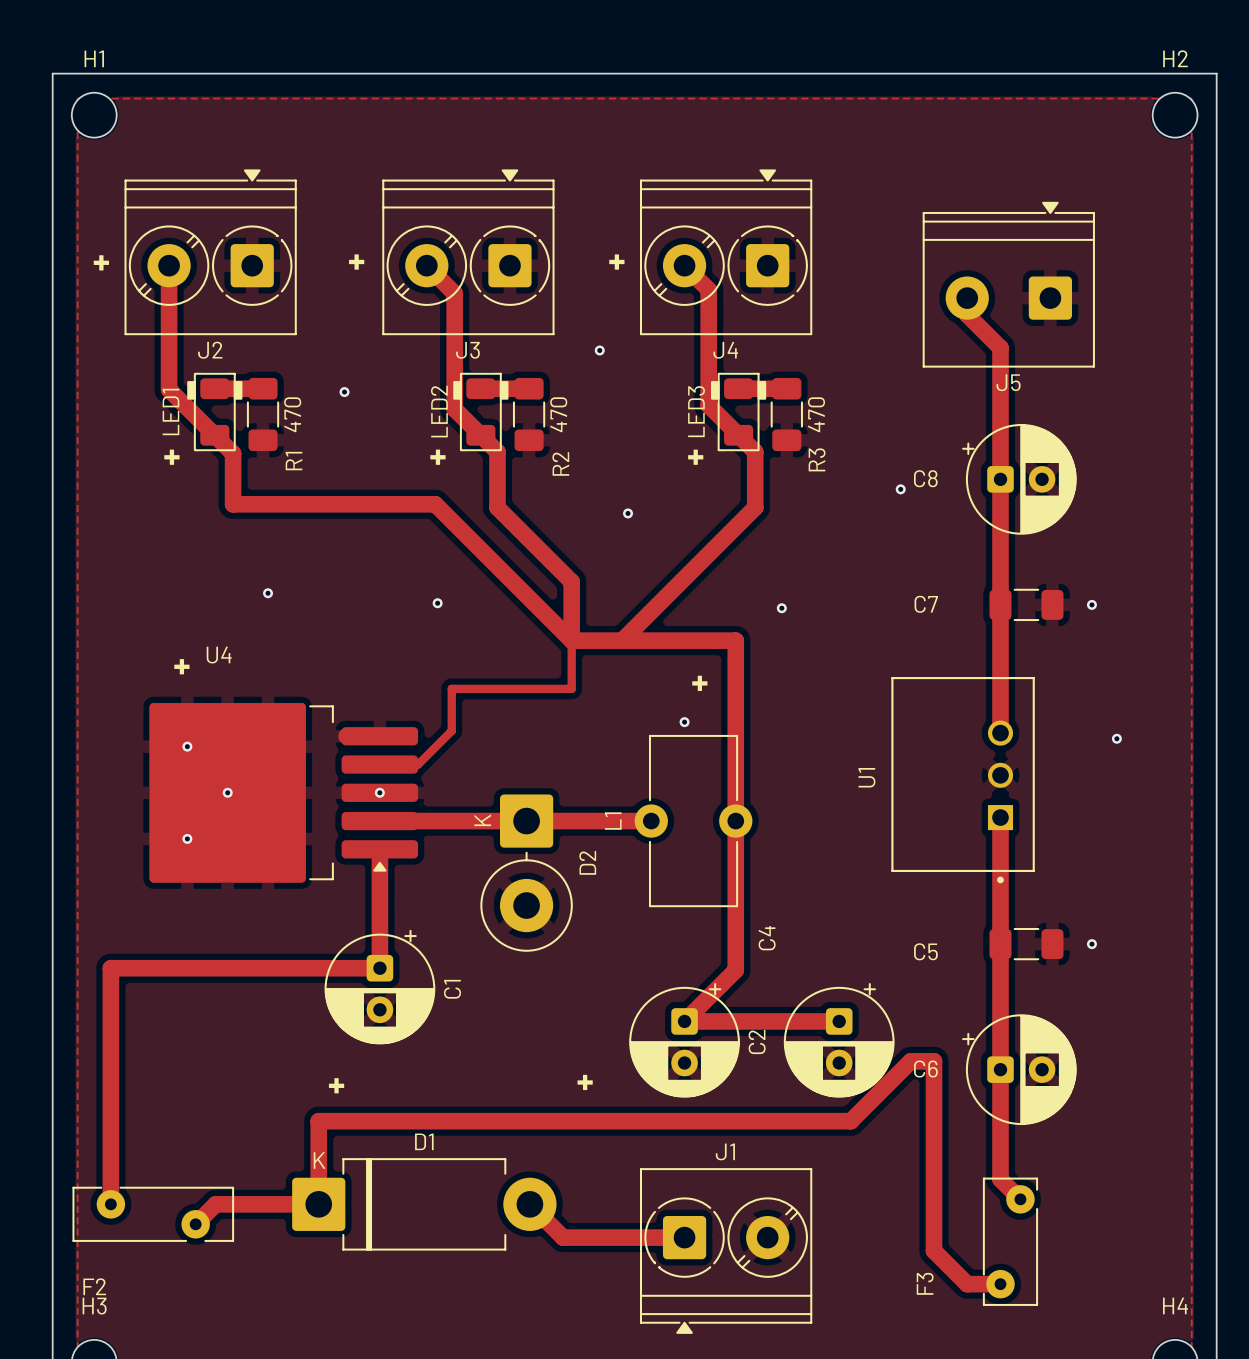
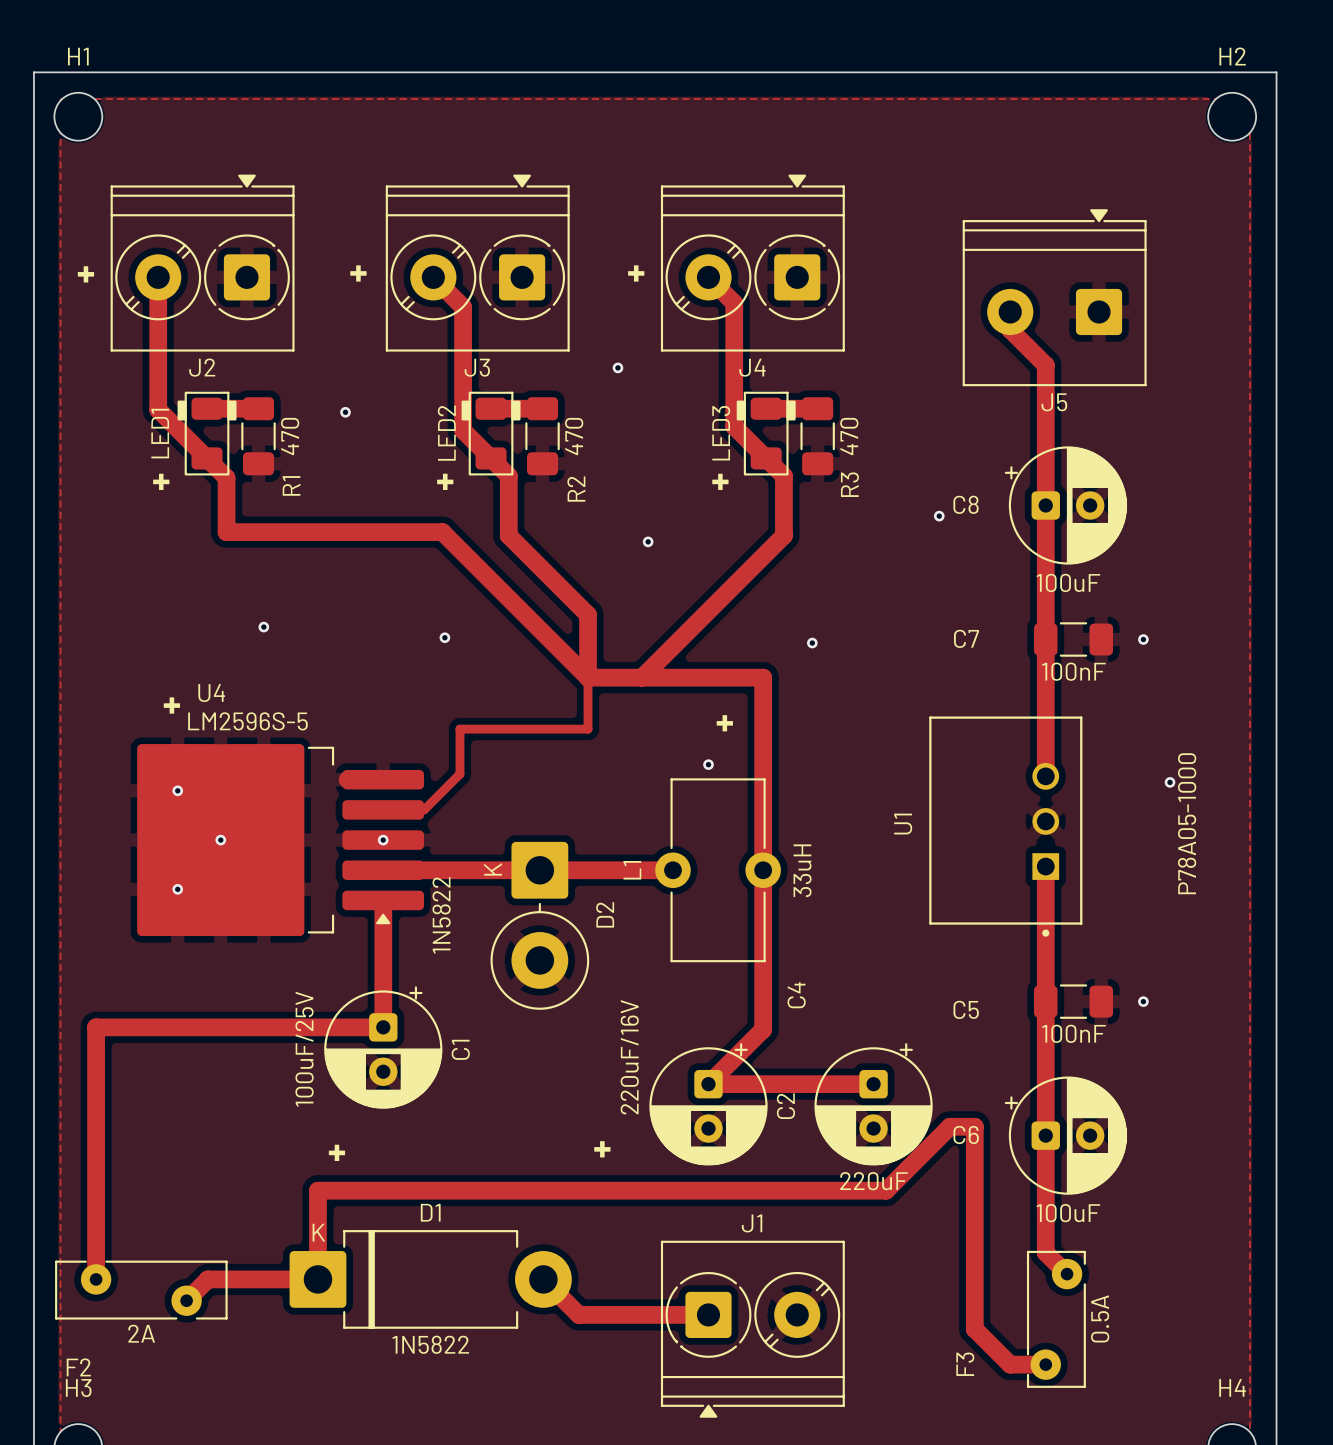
C8 value: none -> 100uF (1068, 582)
C7 value: none -> 100nF (1073, 671)
U4 value: none -> LM2596S-5 (247, 721)
U1 value: none -> P78A05-1000 (1187, 823)
L1 value: none -> 33uH (802, 870)
D2 value: none -> 1N5822 (441, 915)
C5 value: none -> 100nF (1073, 1033)
C1 value: none -> 100uF/25V (304, 1049)
C2 value: none -> 220uF/16V (629, 1057)
C4 value: none -> 220uF (874, 1181)
C6 value: none -> 100uF (1068, 1213)
F3 value: none -> 0.5A (1100, 1318)
F2 value: none -> 2A (141, 1333)
D1 value: none -> 1N5822 (430, 1344)

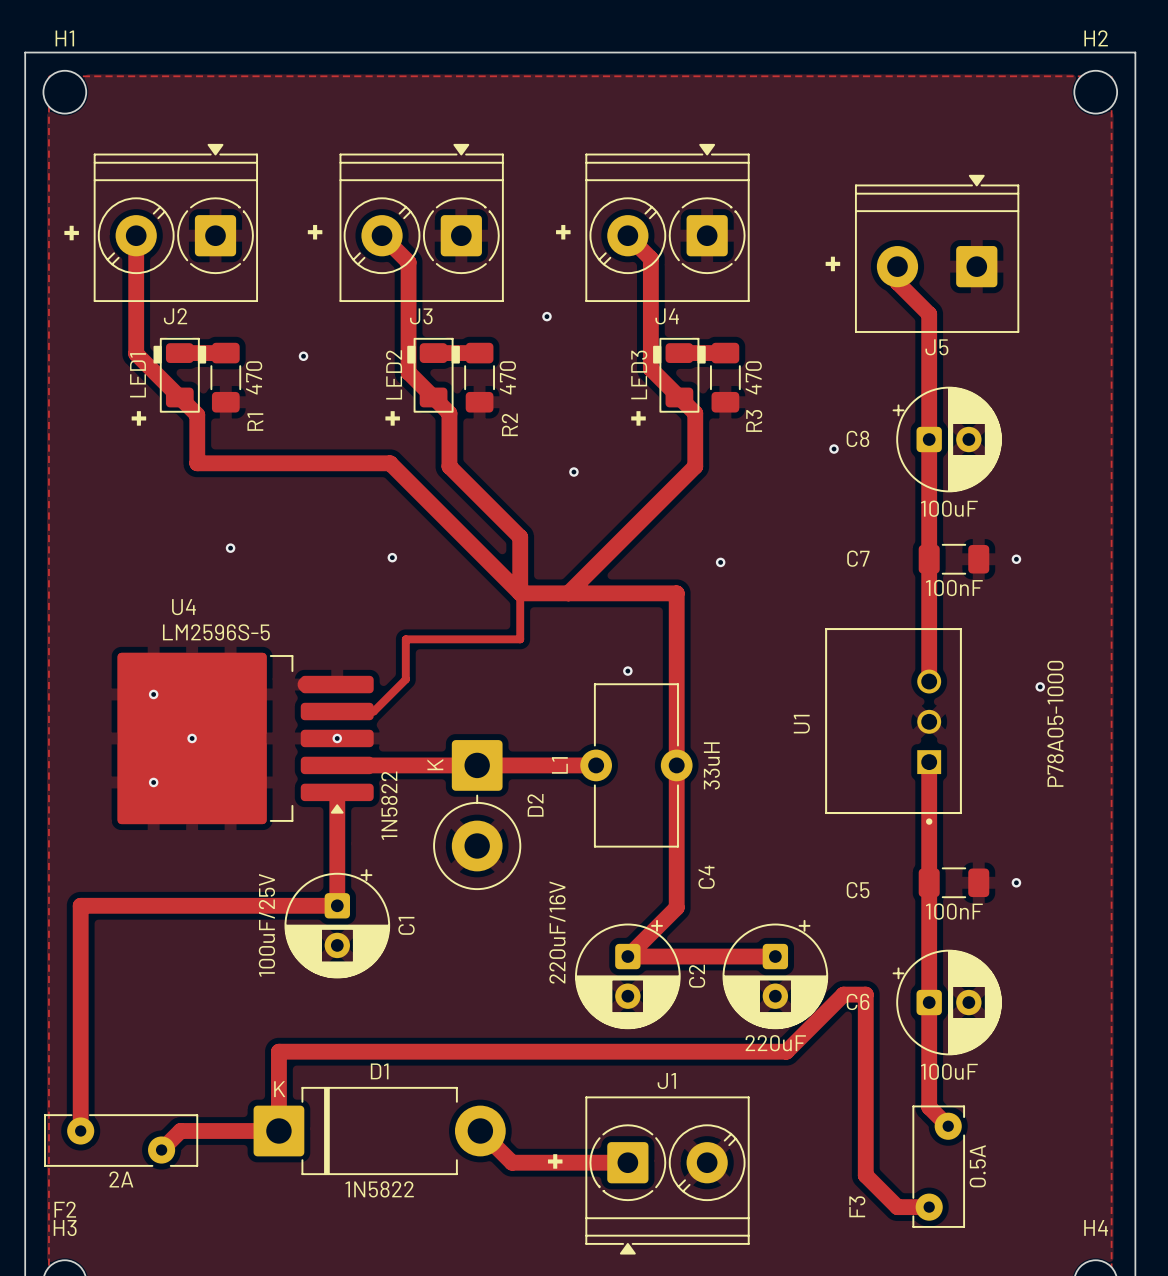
text: none -> + (832, 263)
text: + (171, 705) -> none
text: + (724, 723) -> none
text: + (602, 1149) -> none
text: + (336, 1152) -> none
text: none -> + (555, 1161)

